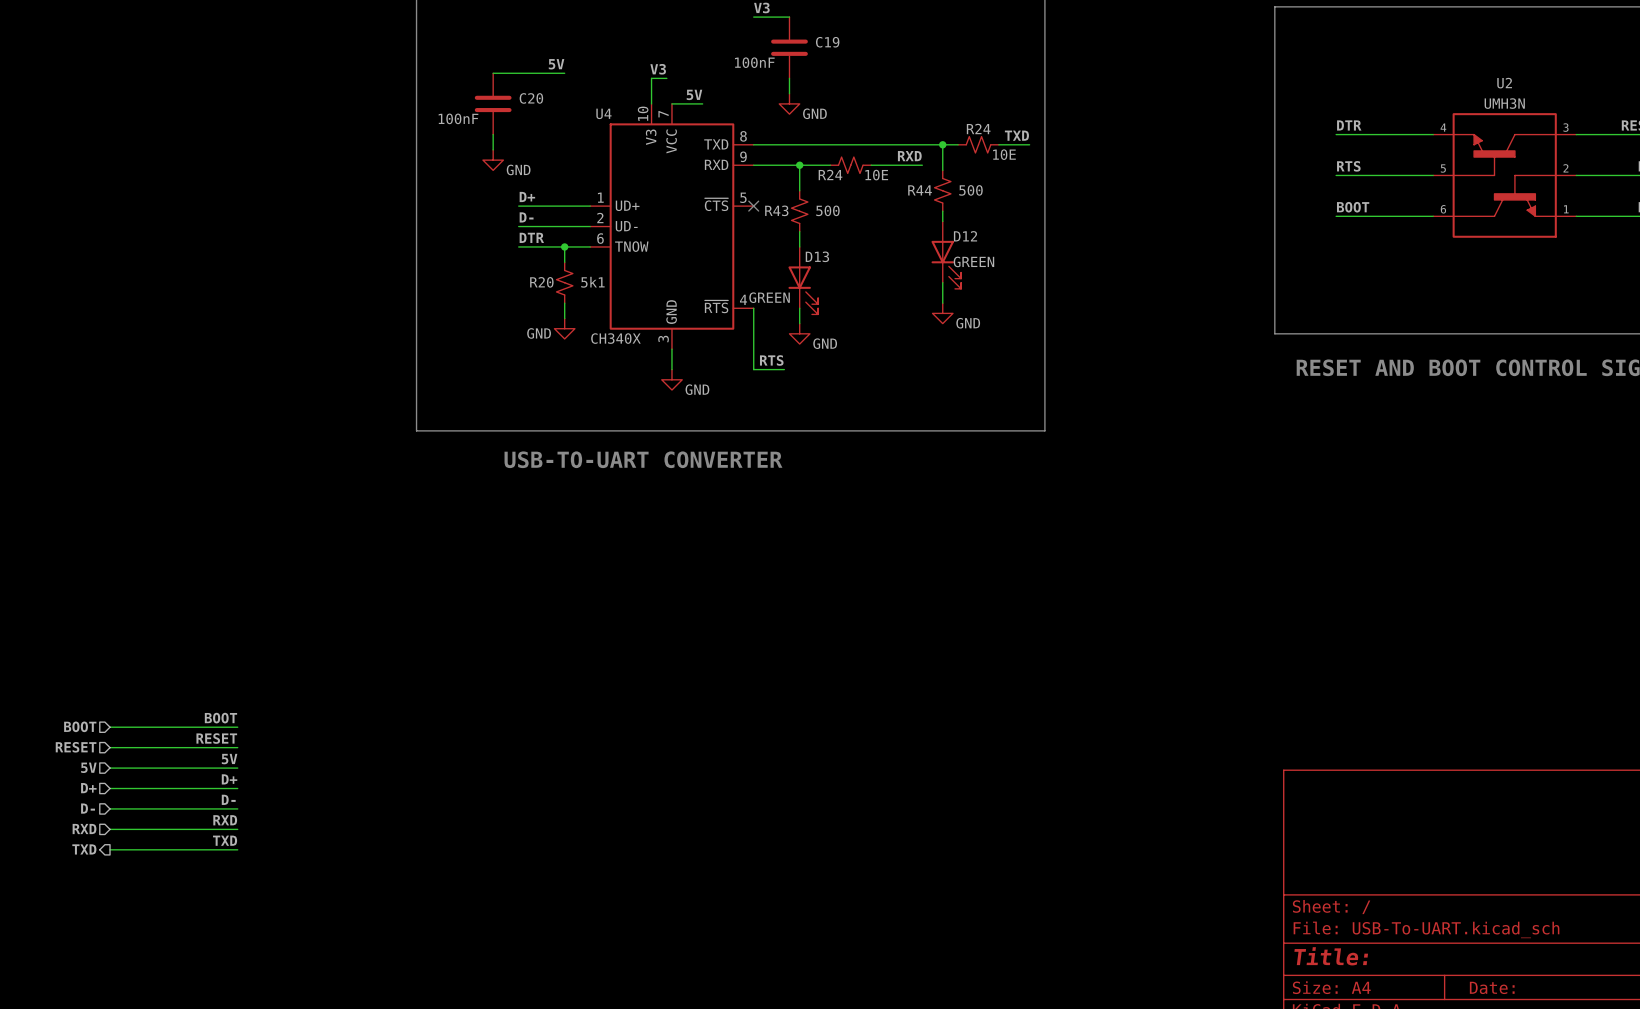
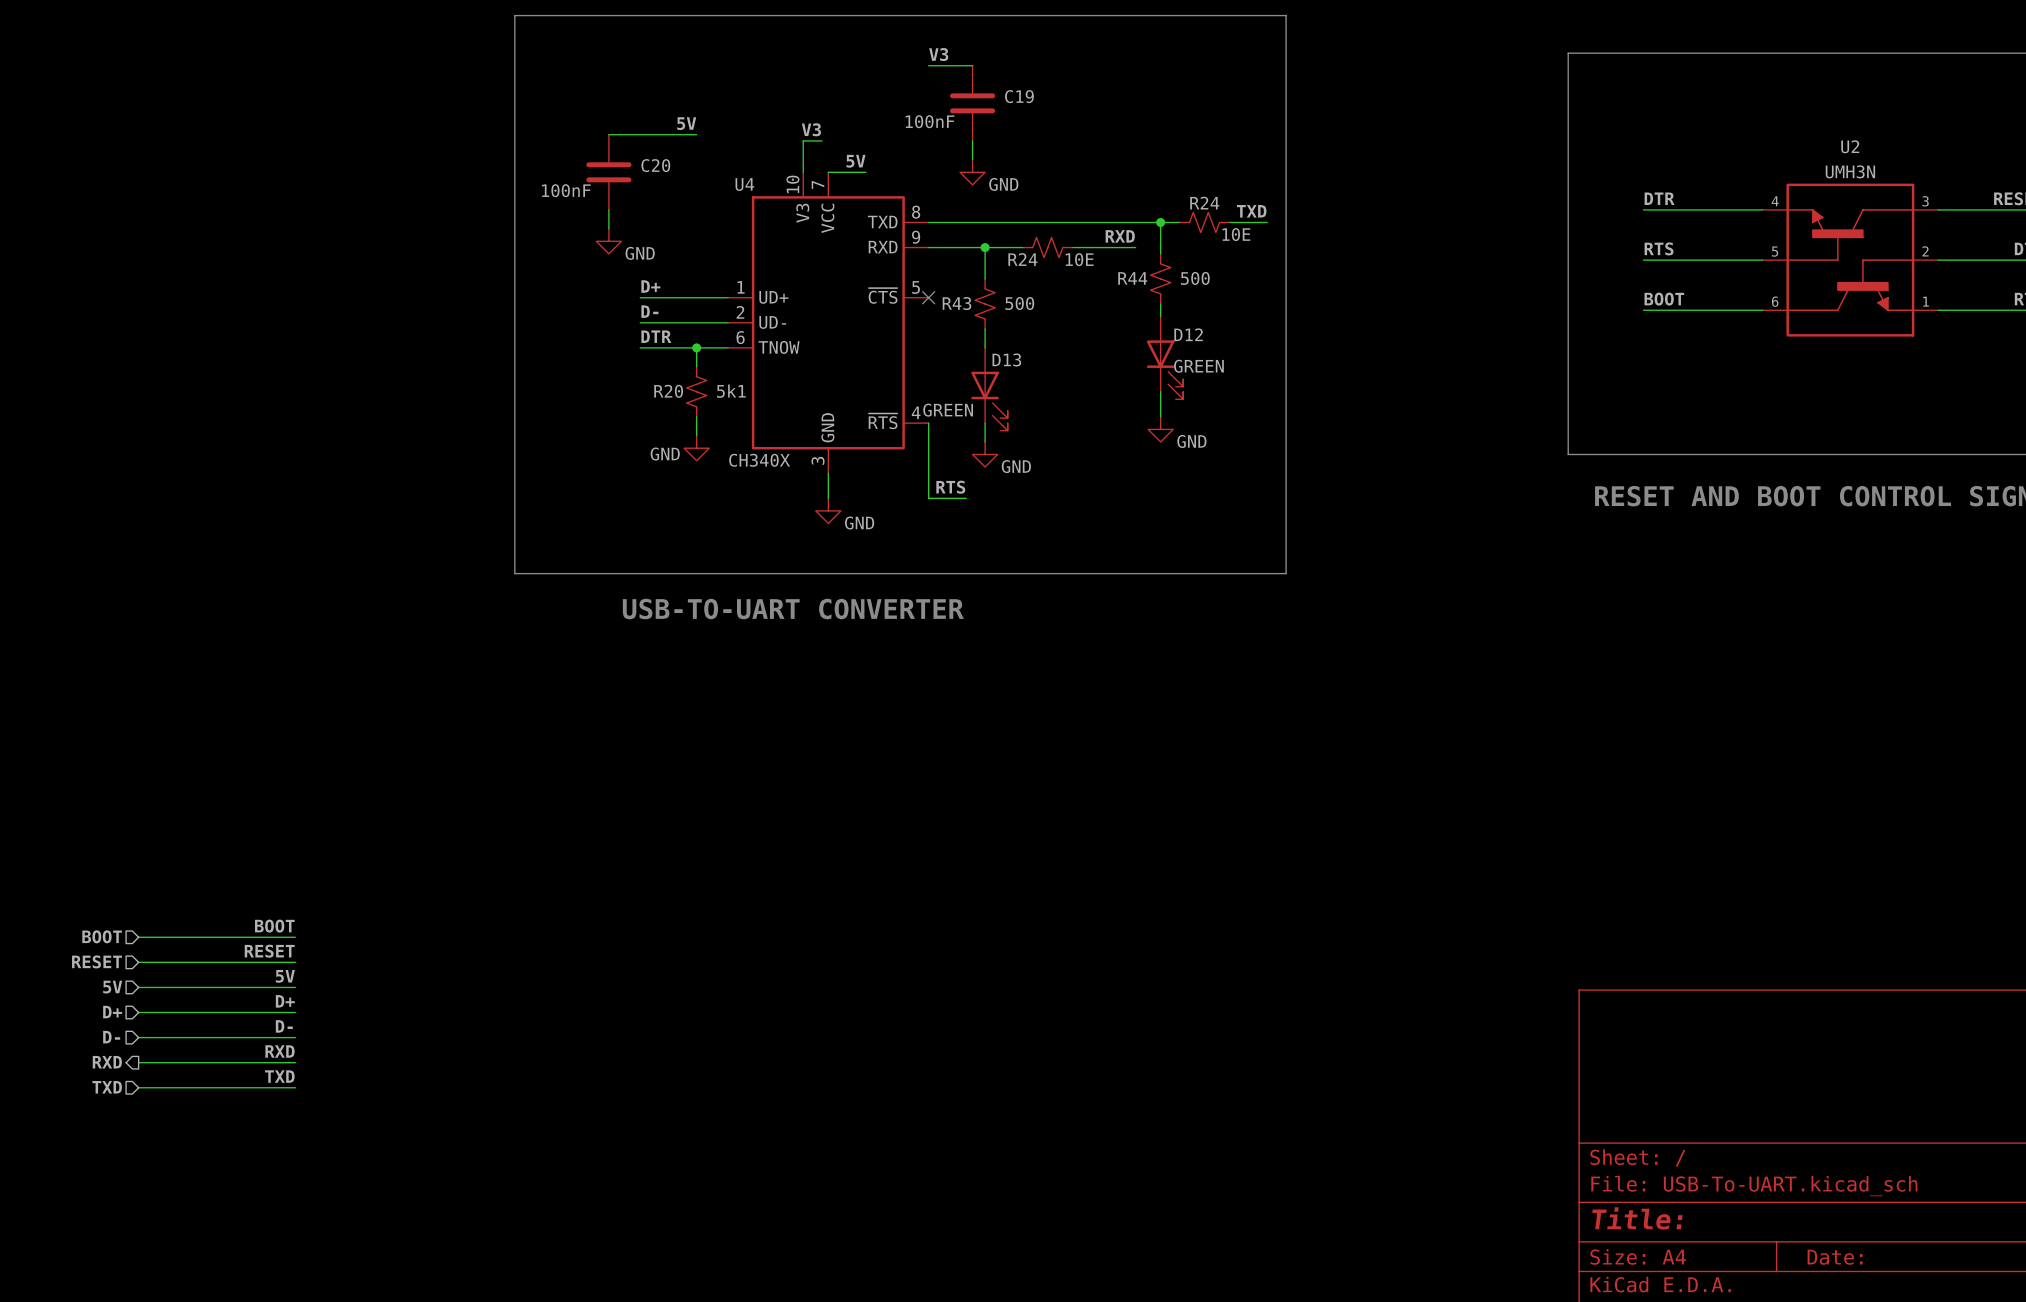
hierarchical label shape: input (84, 829) -> output (107, 1062)
hierarchical label shape: output (84, 849) -> input (107, 1087)

